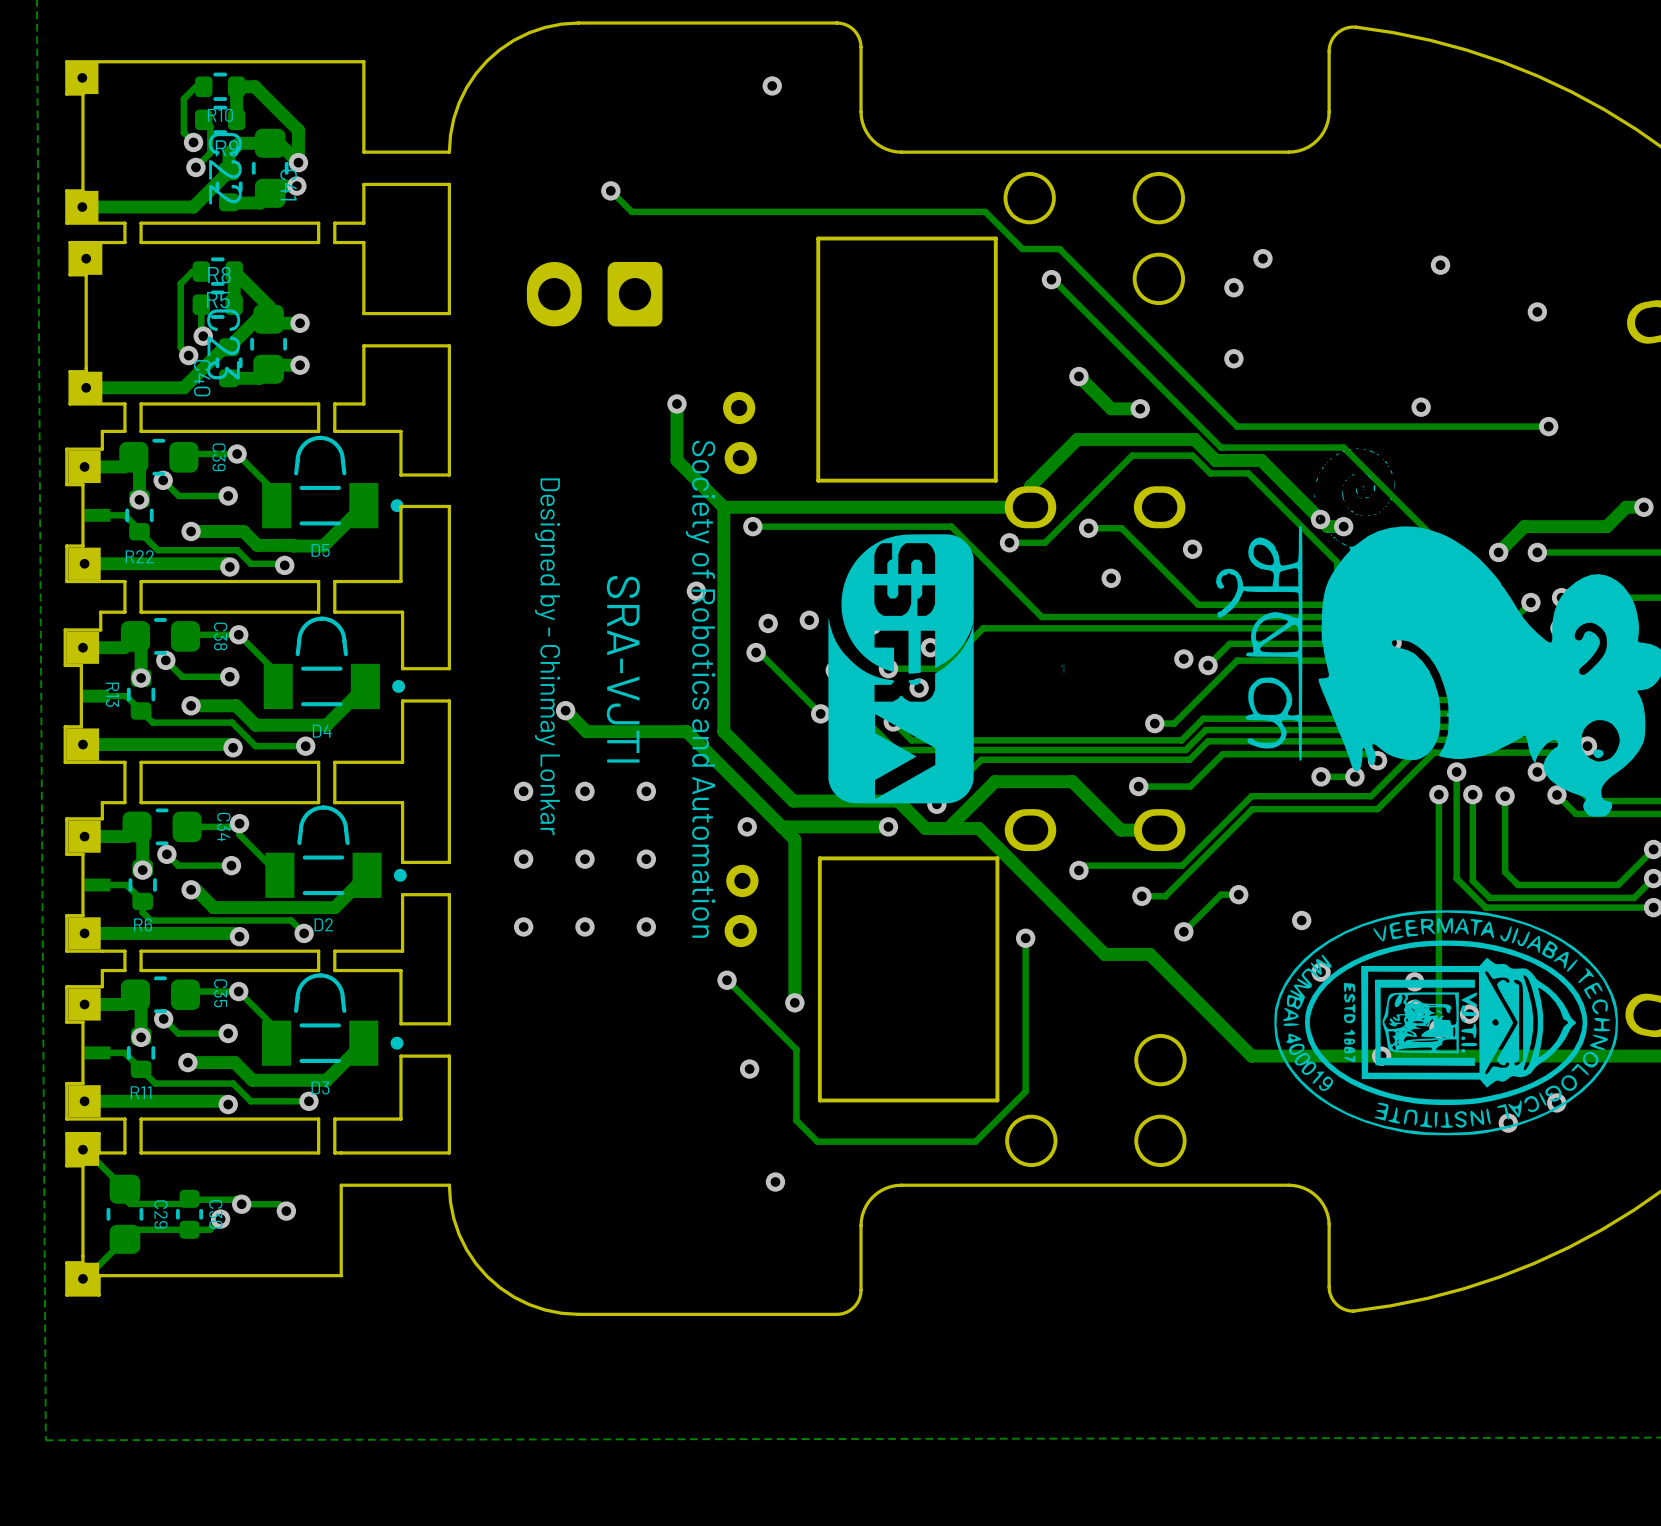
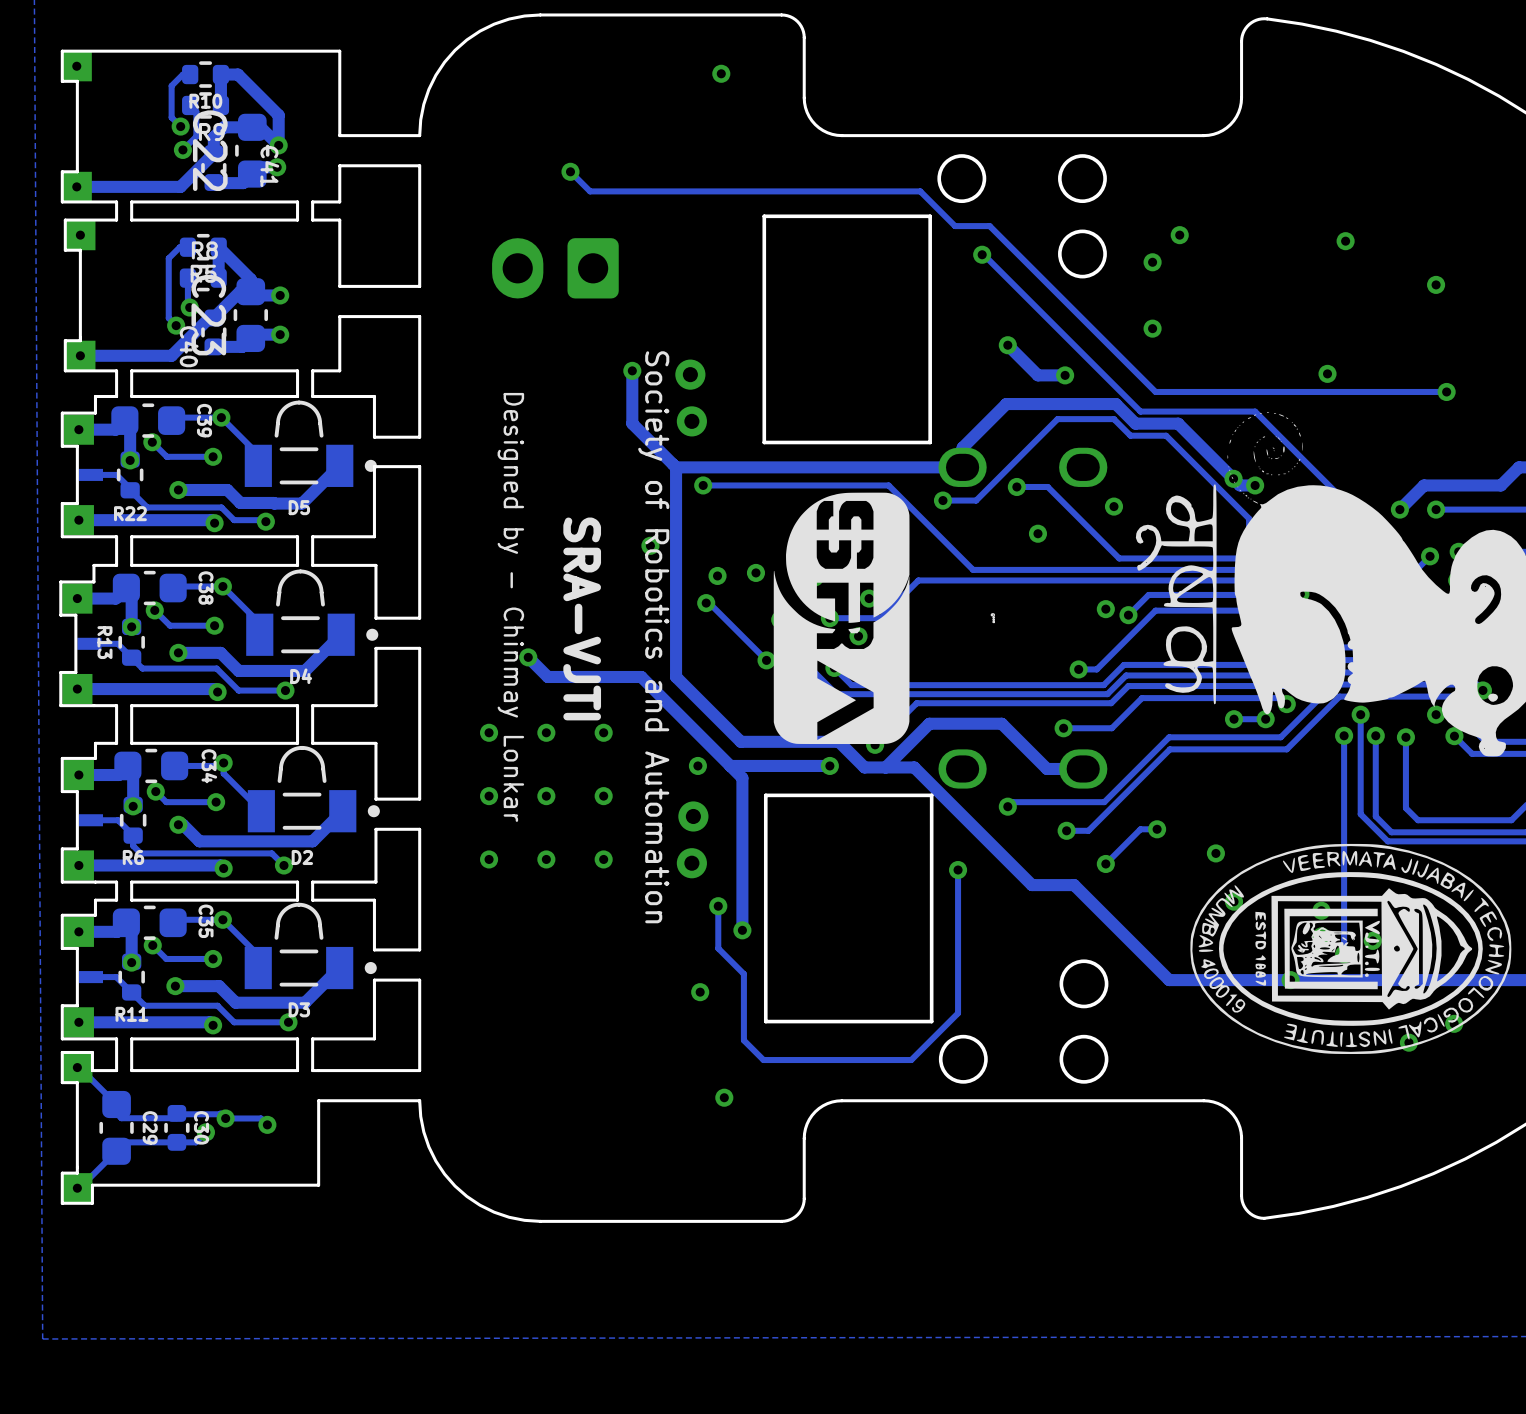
track: (727, 980) (769, 1022) -> (718, 906) (718, 948)
via position: (727, 980) -> (718, 906)

